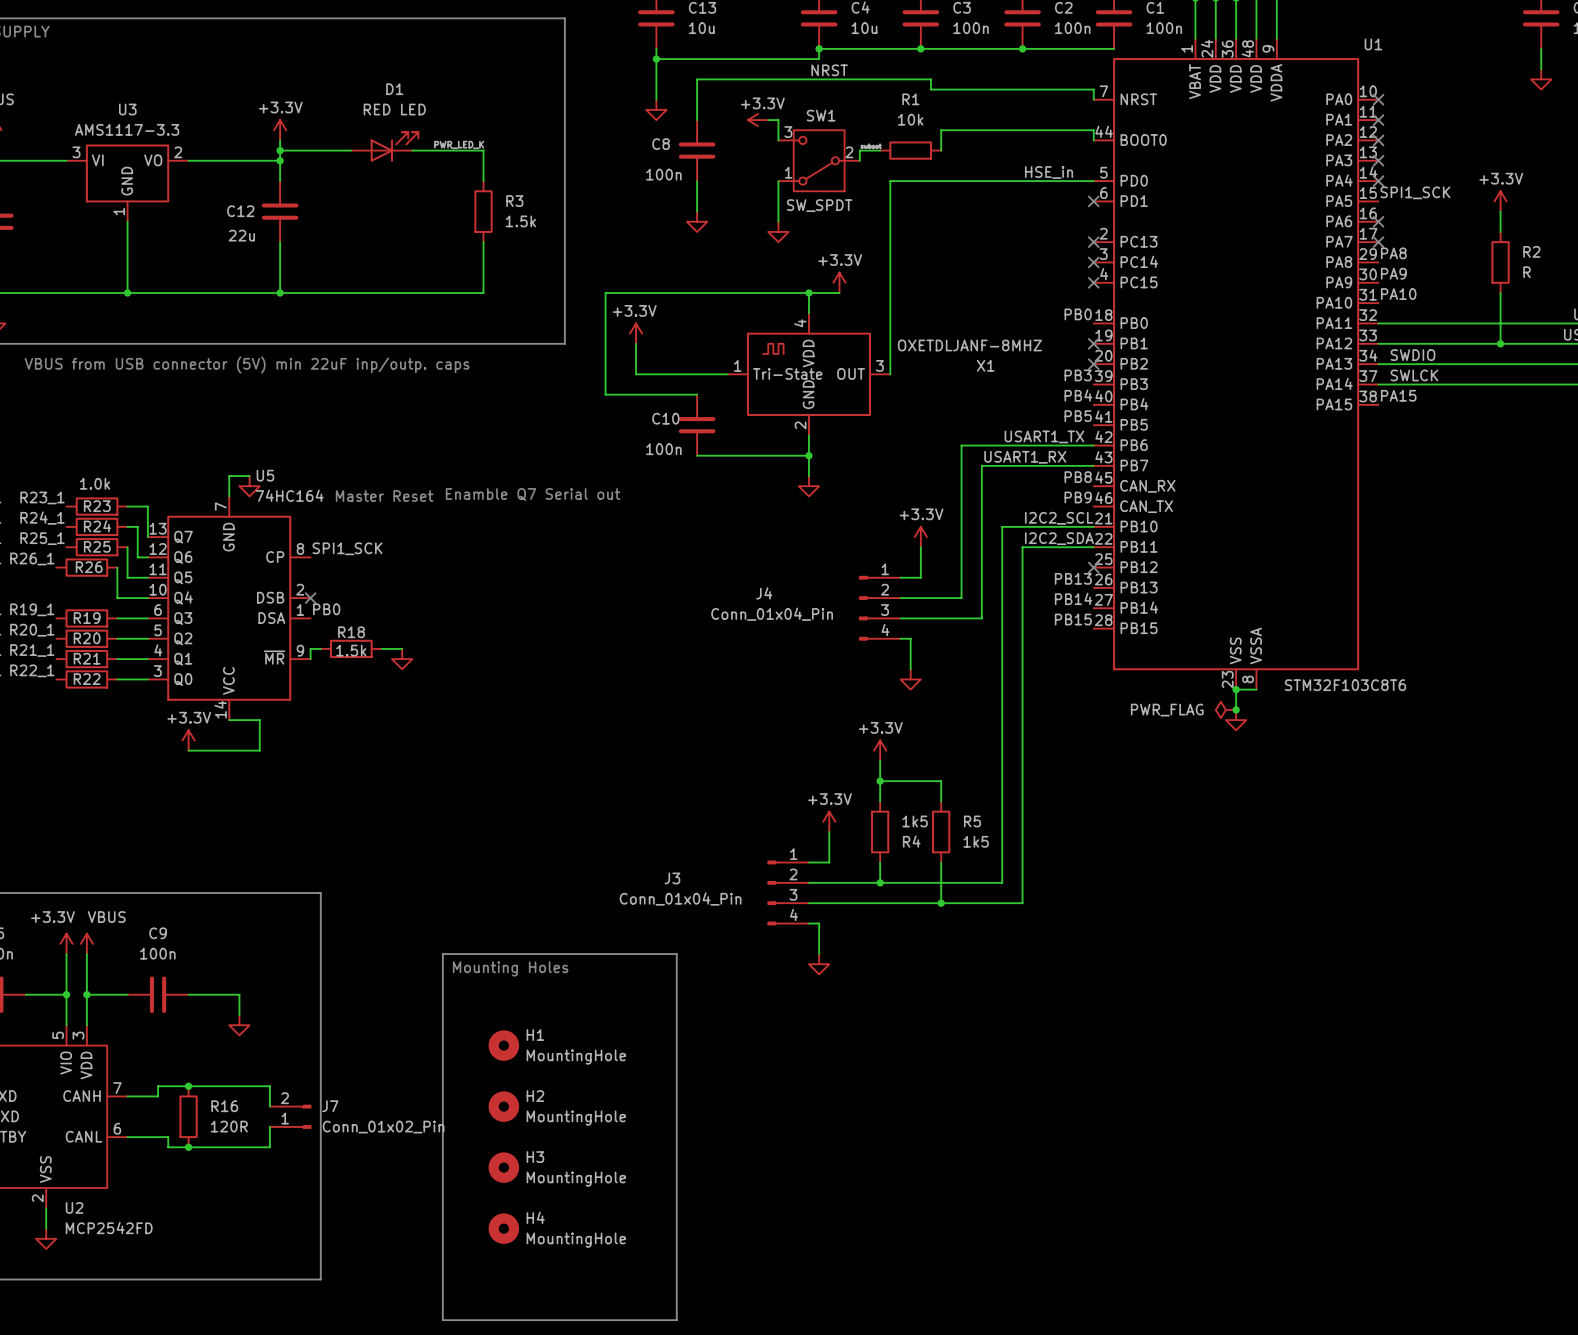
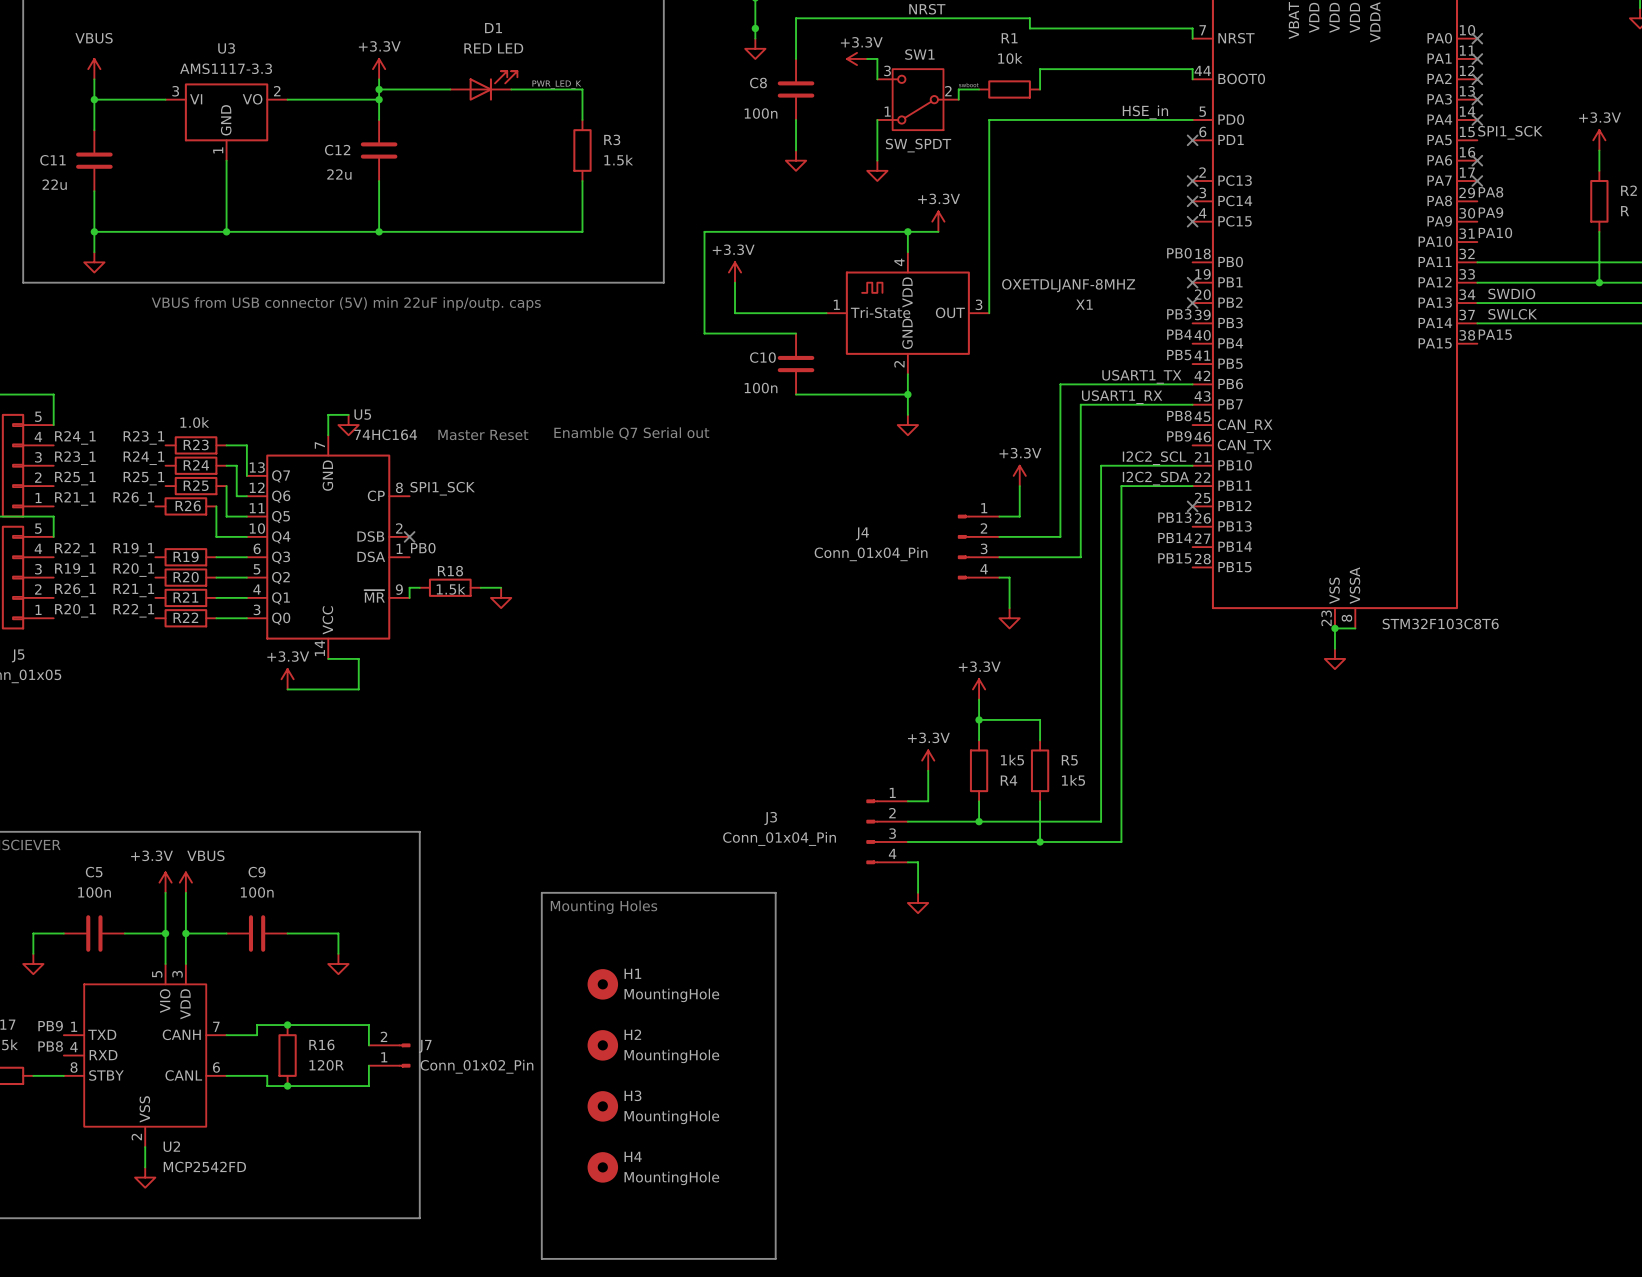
junction: none -> (755, 28)
power symbol: PWR_FLAG (1225, 709) -> none
junction: (1236, 709) -> none

